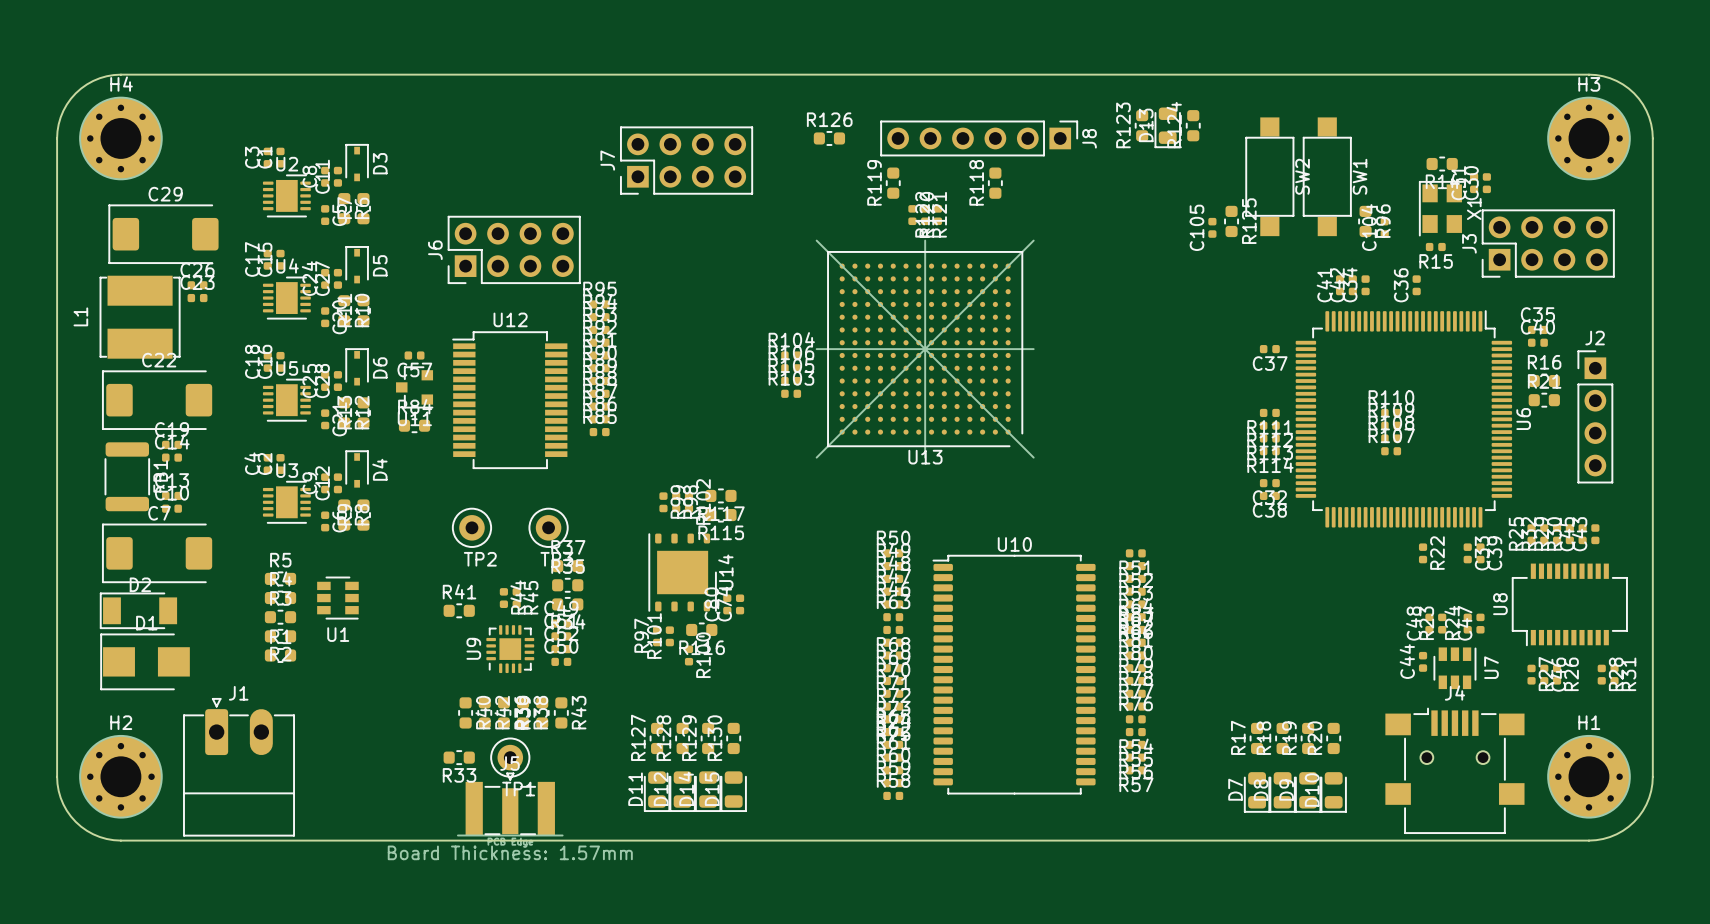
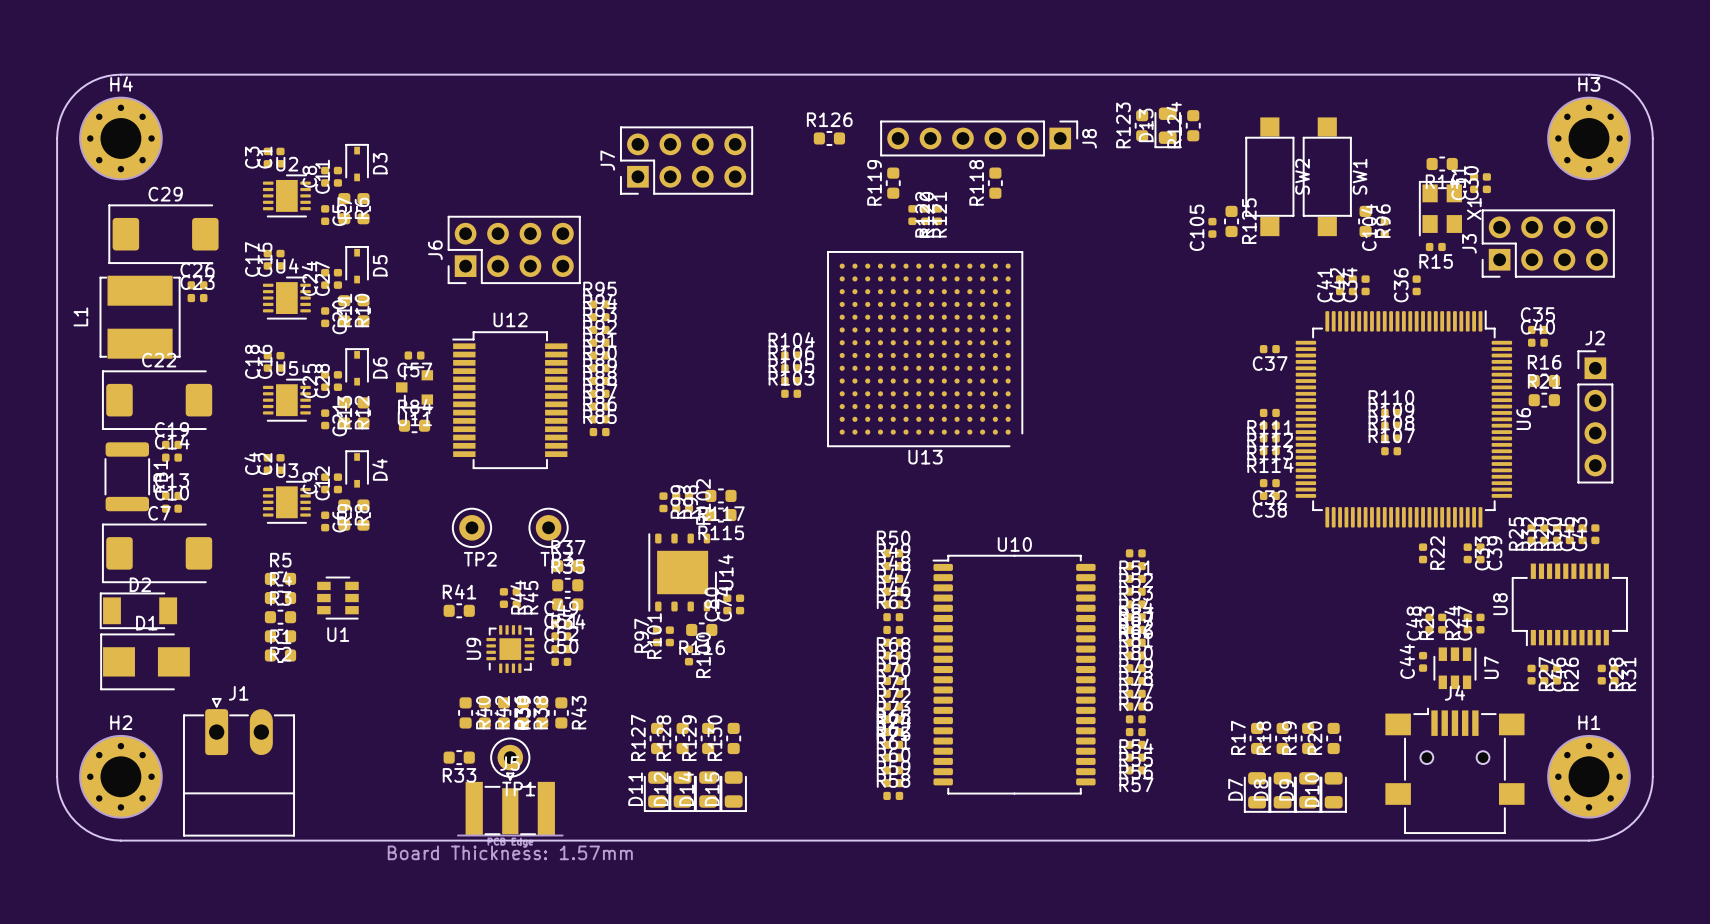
line: (816, 240) (1033, 457) -> none
line: (925, 240) (925, 457) -> none
line: (1033, 240) (816, 457) -> none
line: (816, 349) (1033, 349) -> none

